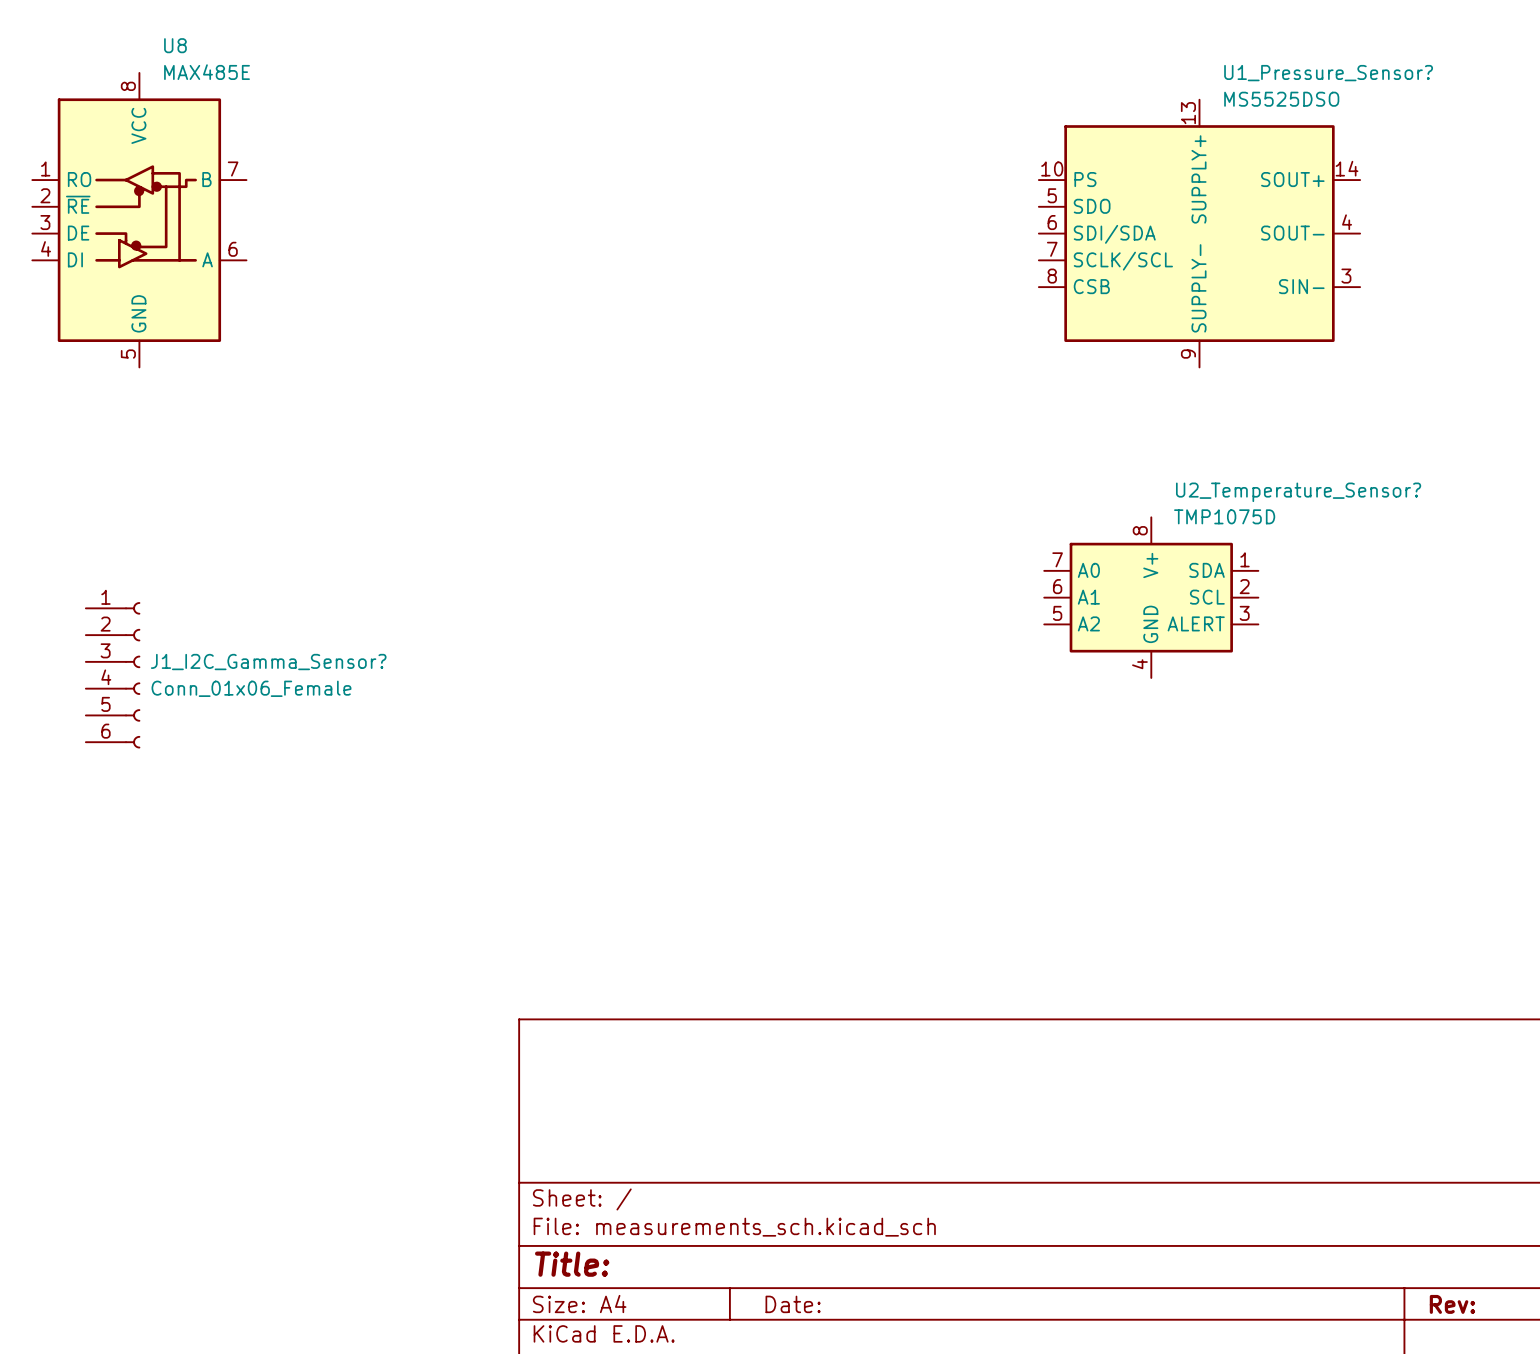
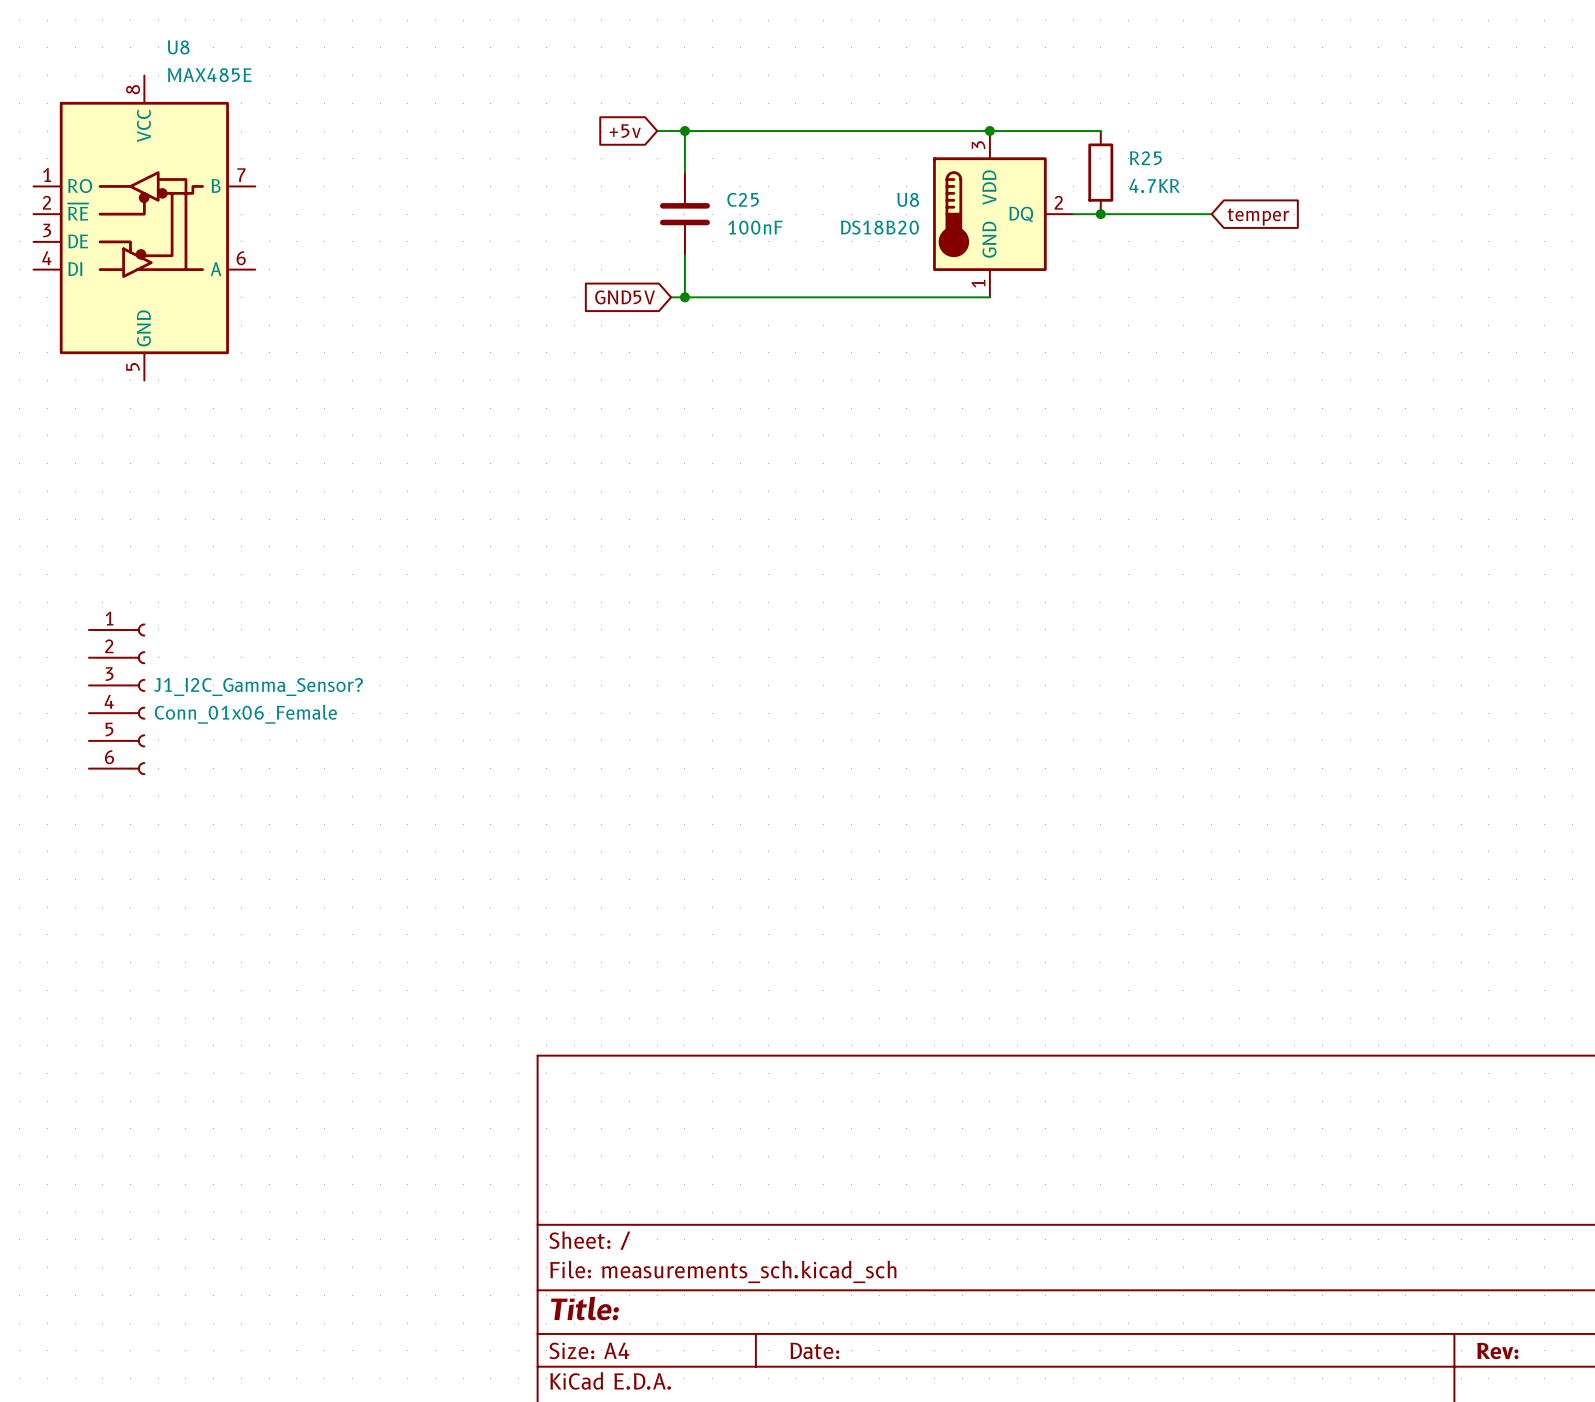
global label: none -> +5v (625, 131)
wire: none -> (657, 131) (1100, 131)
wire: none -> (684, 131) (684, 172)
junction: none -> (684, 131)
junction: none -> (989, 131)
R25: none -> 4.7KR (1100, 172)
C25: none -> 100nF (684, 214)
U8: none -> DS18B20 (1003, 214)
junction: none -> (1100, 214)
global label: none -> temper (1258, 216)
U1_Pressure_Sensor?: MS5525DSO (1199, 233) -> none
wire: none -> (684, 255) (684, 297)
global label: none -> GND5V (625, 297)
wire: none -> (671, 297) (989, 297)
junction: none -> (684, 297)
U2_Temperature_Sensor?: TMP1075D (1151, 597) -> none

